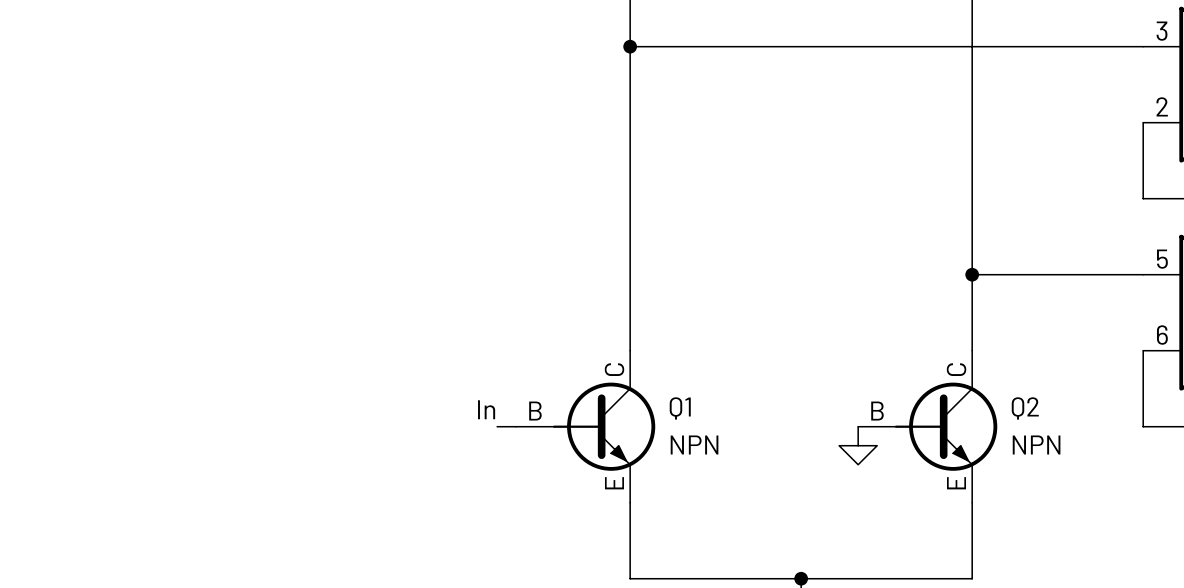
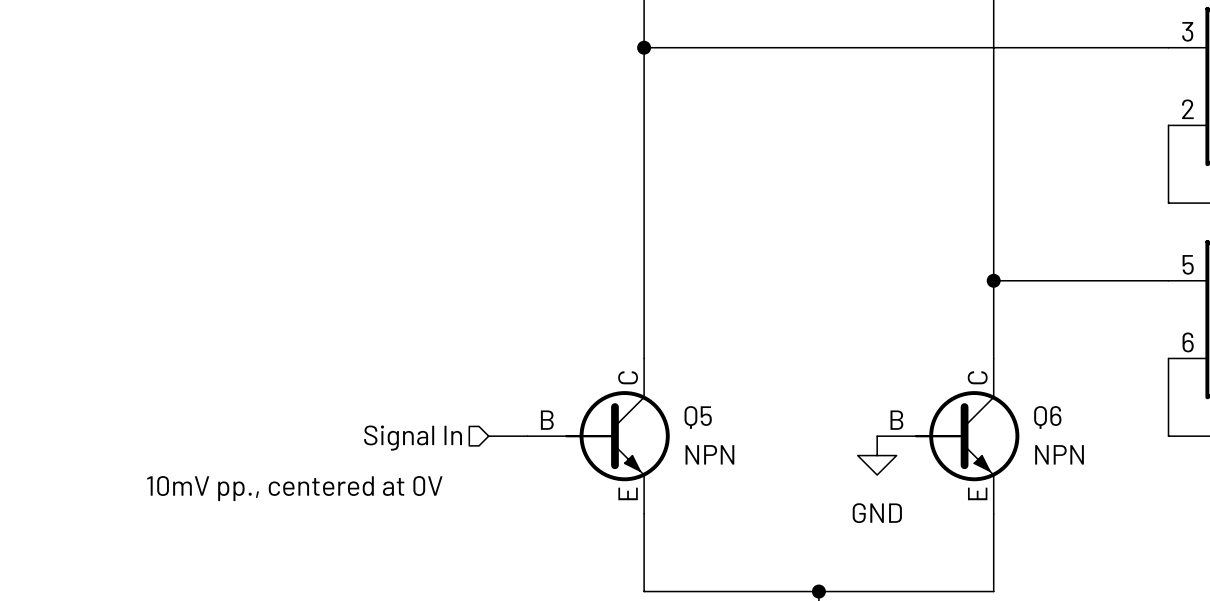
Q1 name: Q1 (680, 408) -> Q5 (698, 417)
Q2 name: Q2 (1025, 408) -> Q6 (1047, 417)
label: In (486, 409) -> none
wire: none -> (488, 436) (508, 436)
hierarchical label: none -> Signal In (413, 438)
text: none -> 10mV pp., centered at 0V (294, 488)
power symbol text: none -> GND (877, 513)

